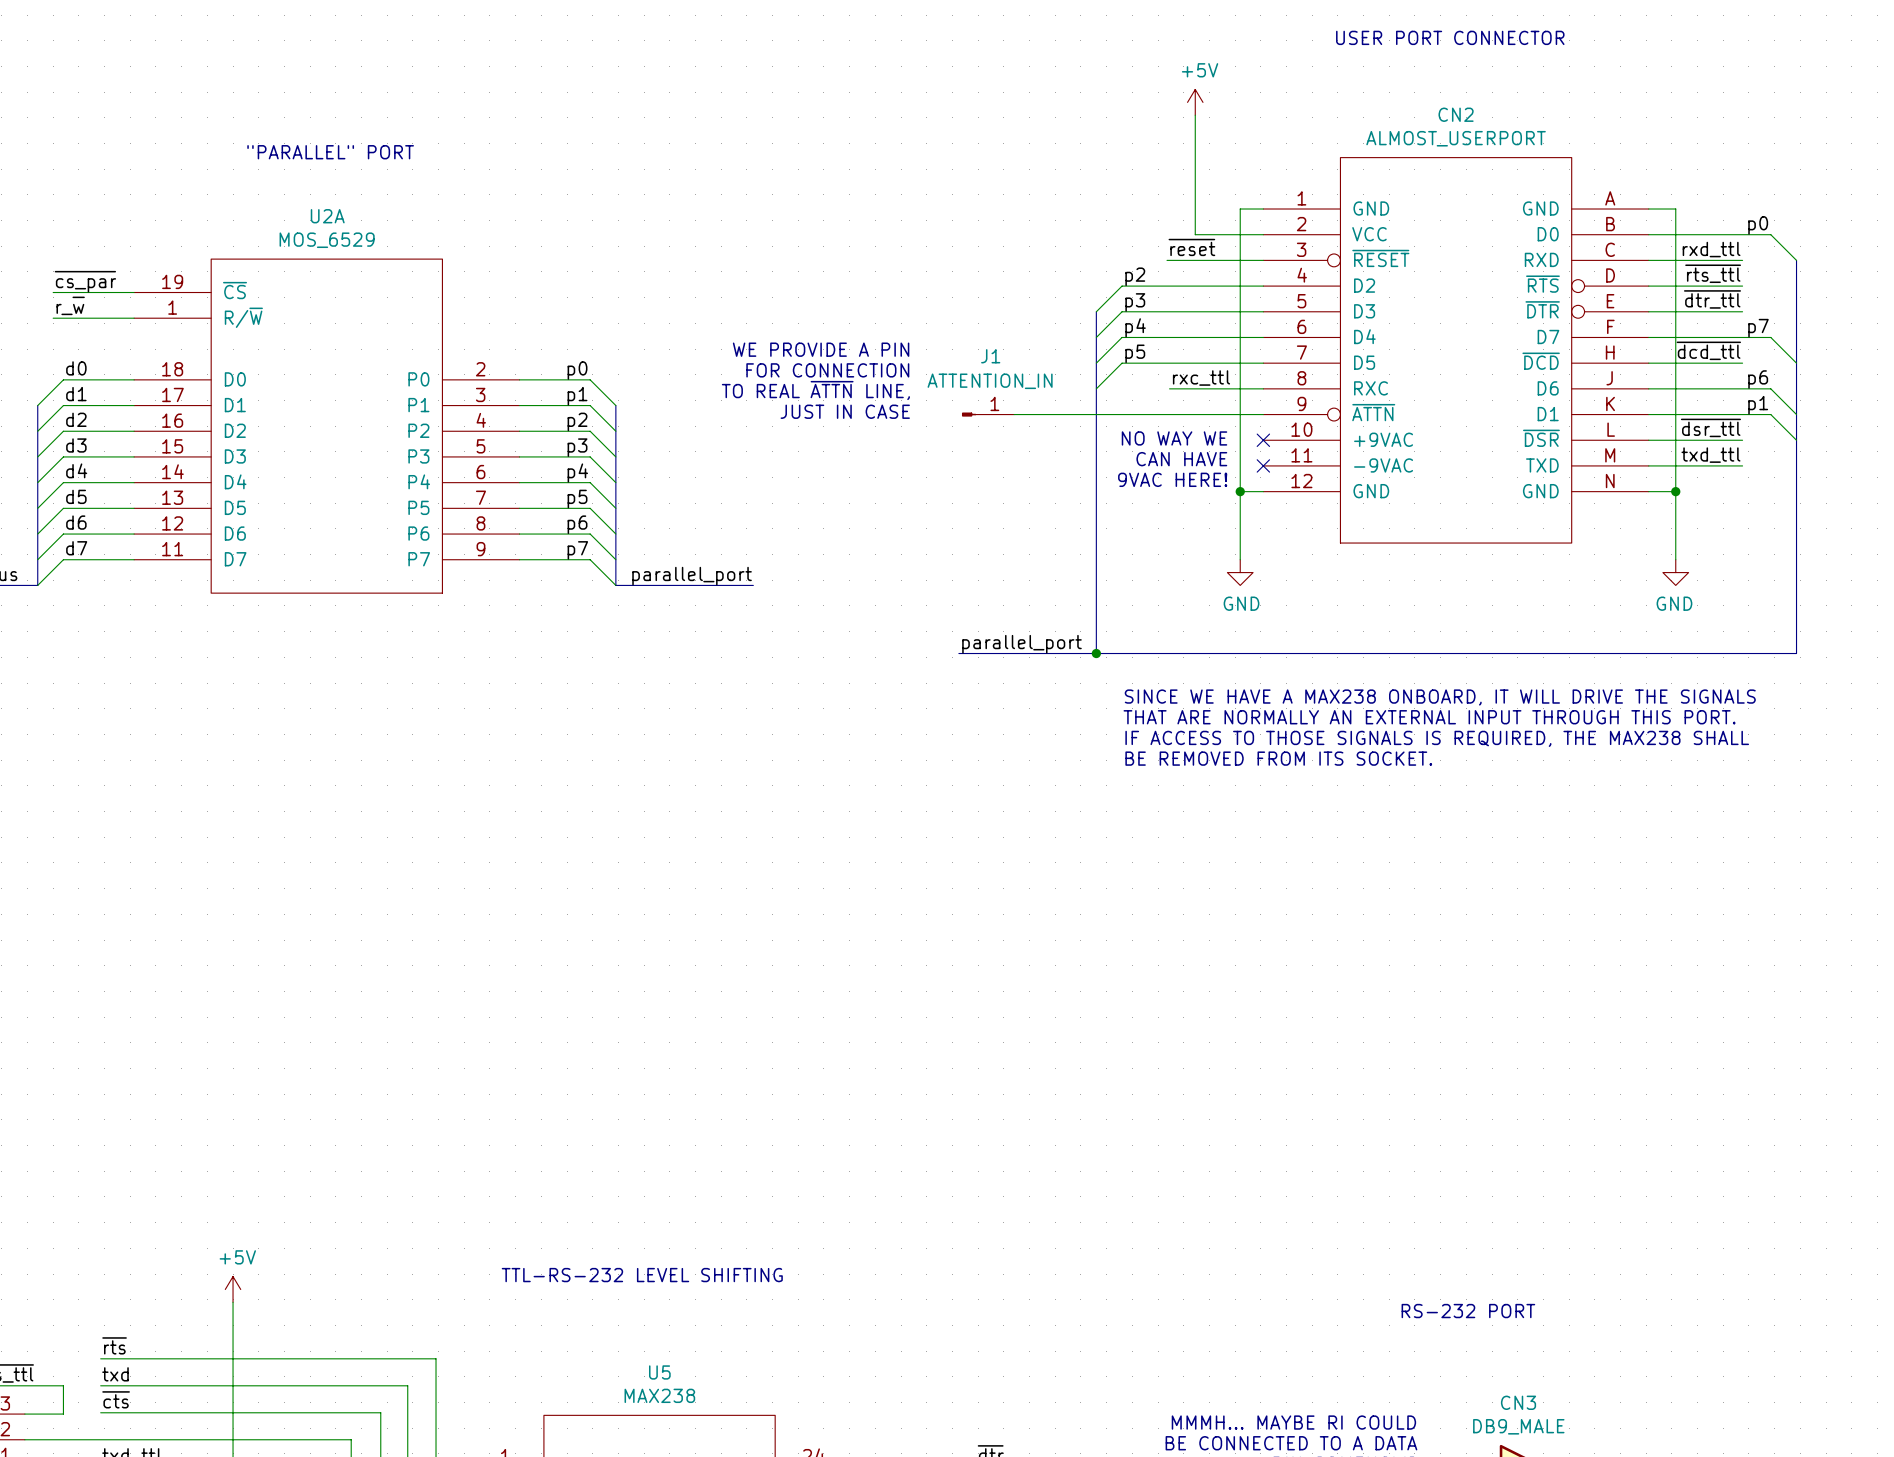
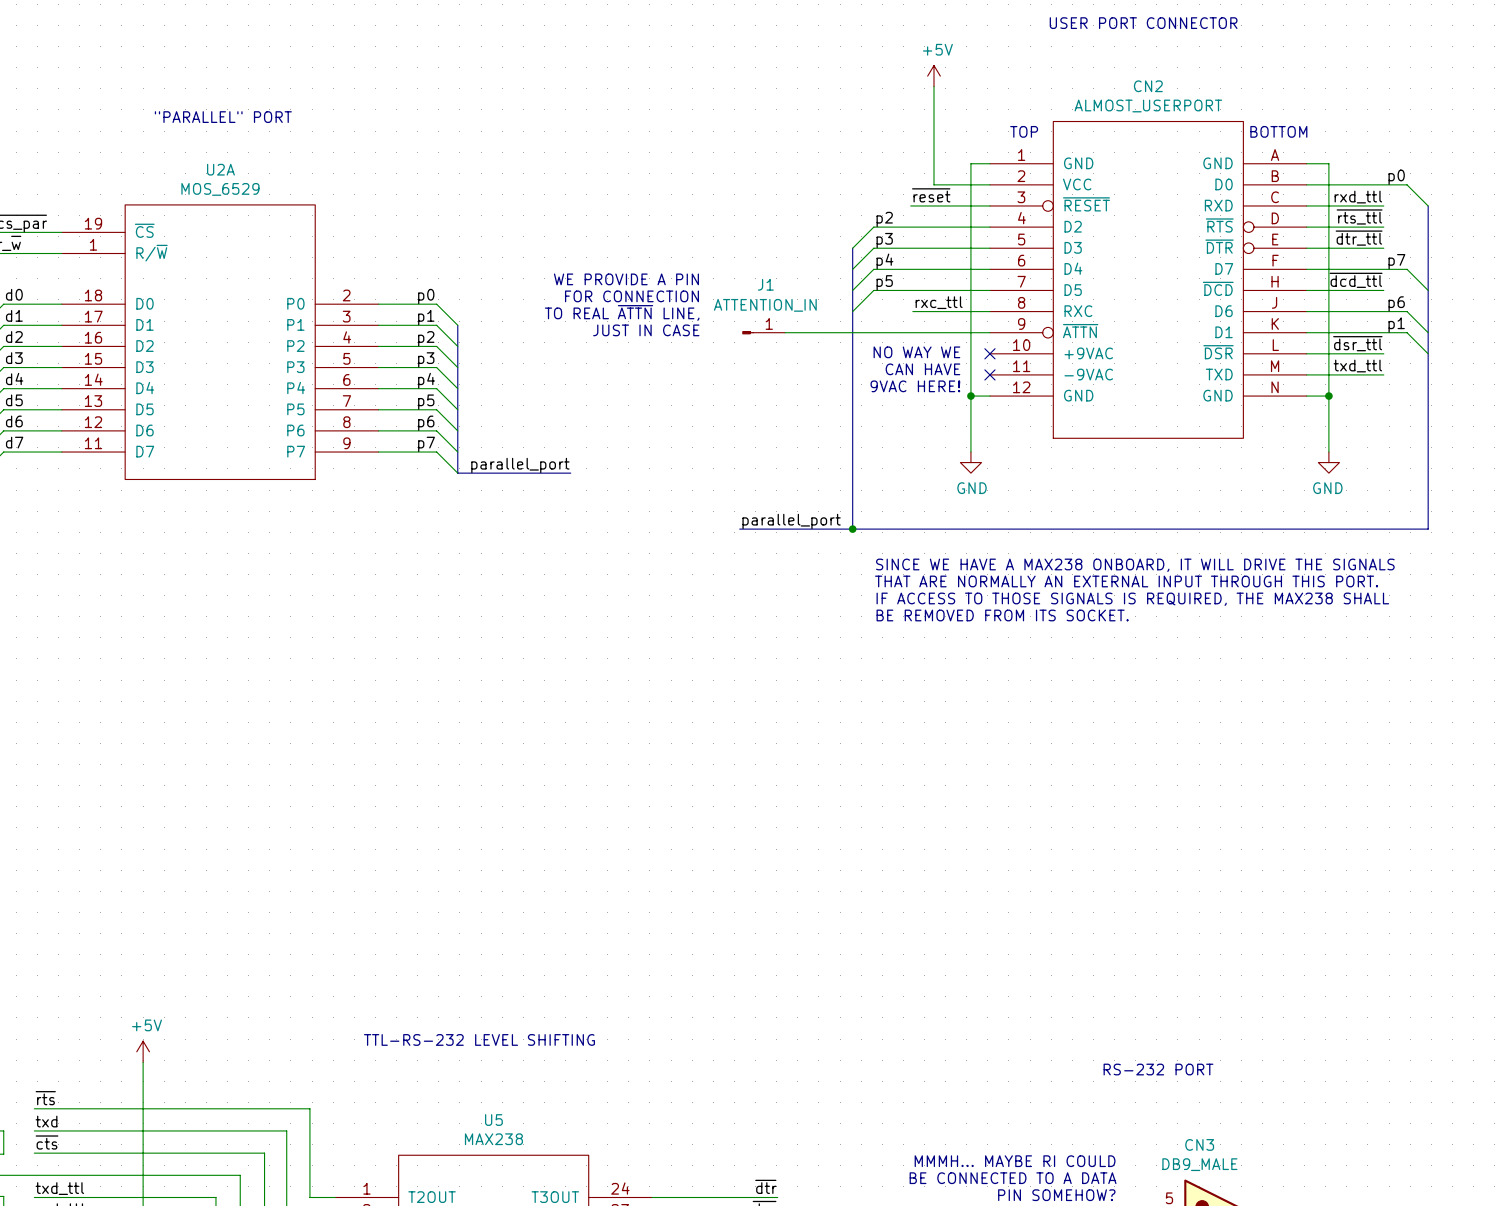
text: none -> TOP (1024, 131)
text: none -> BOTTOM (1278, 131)

